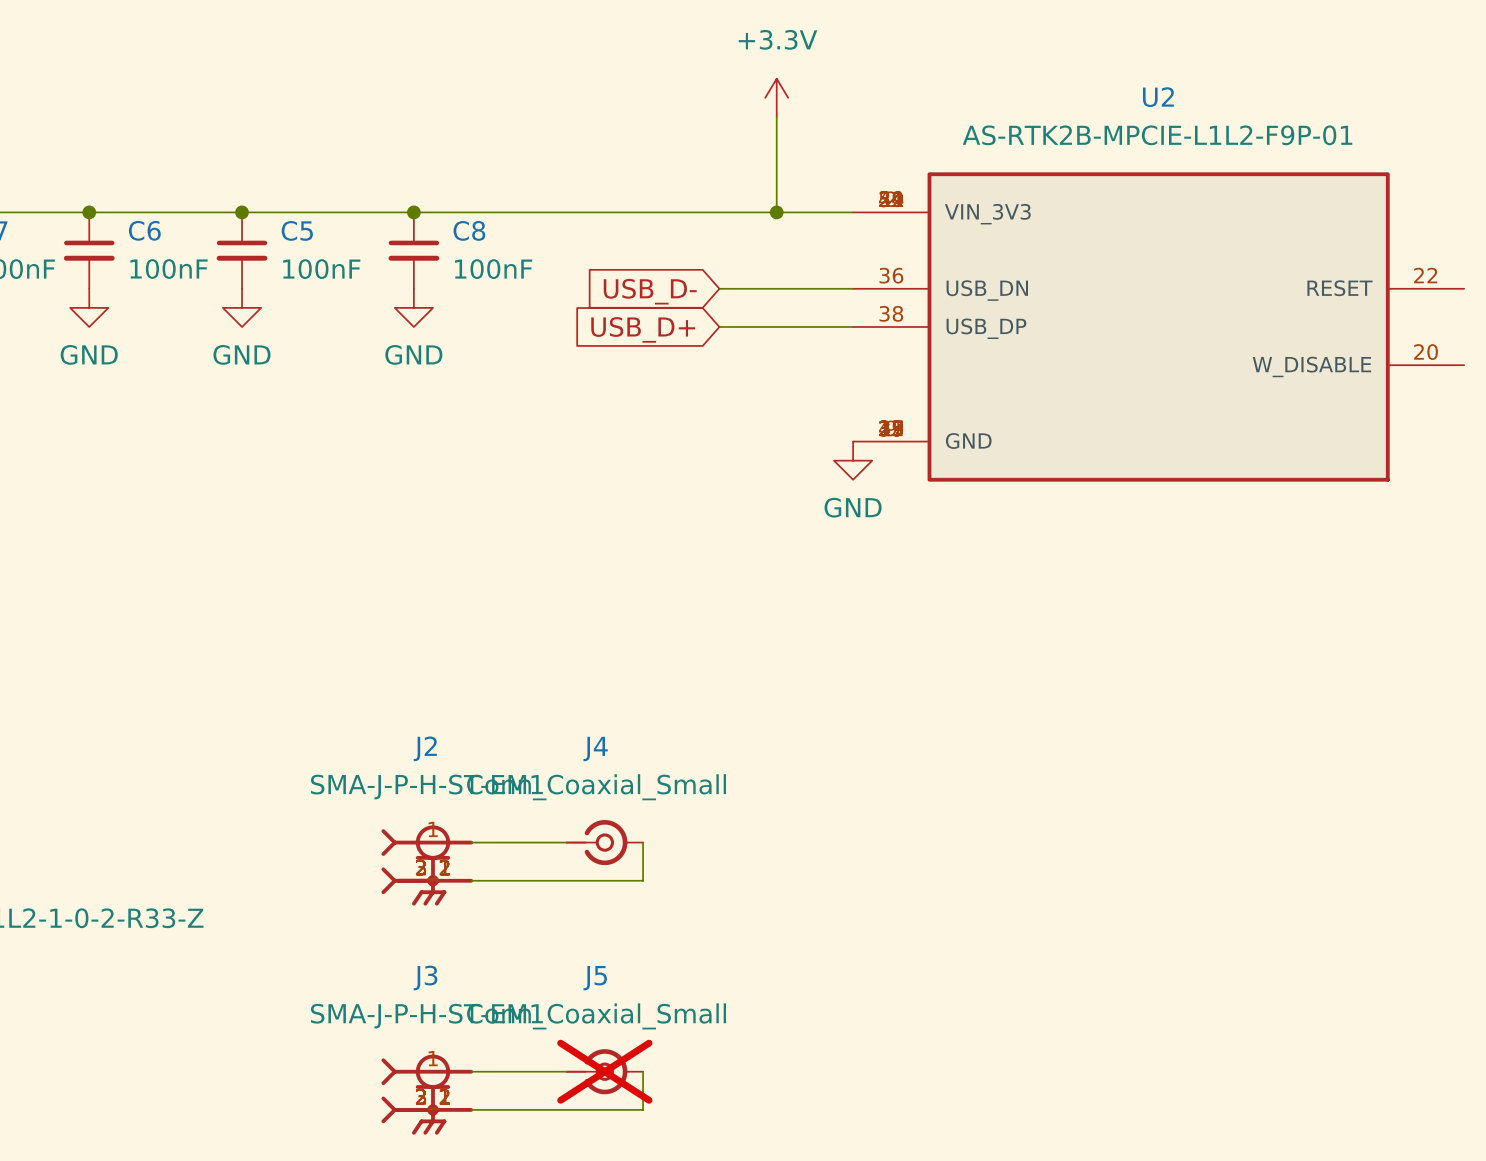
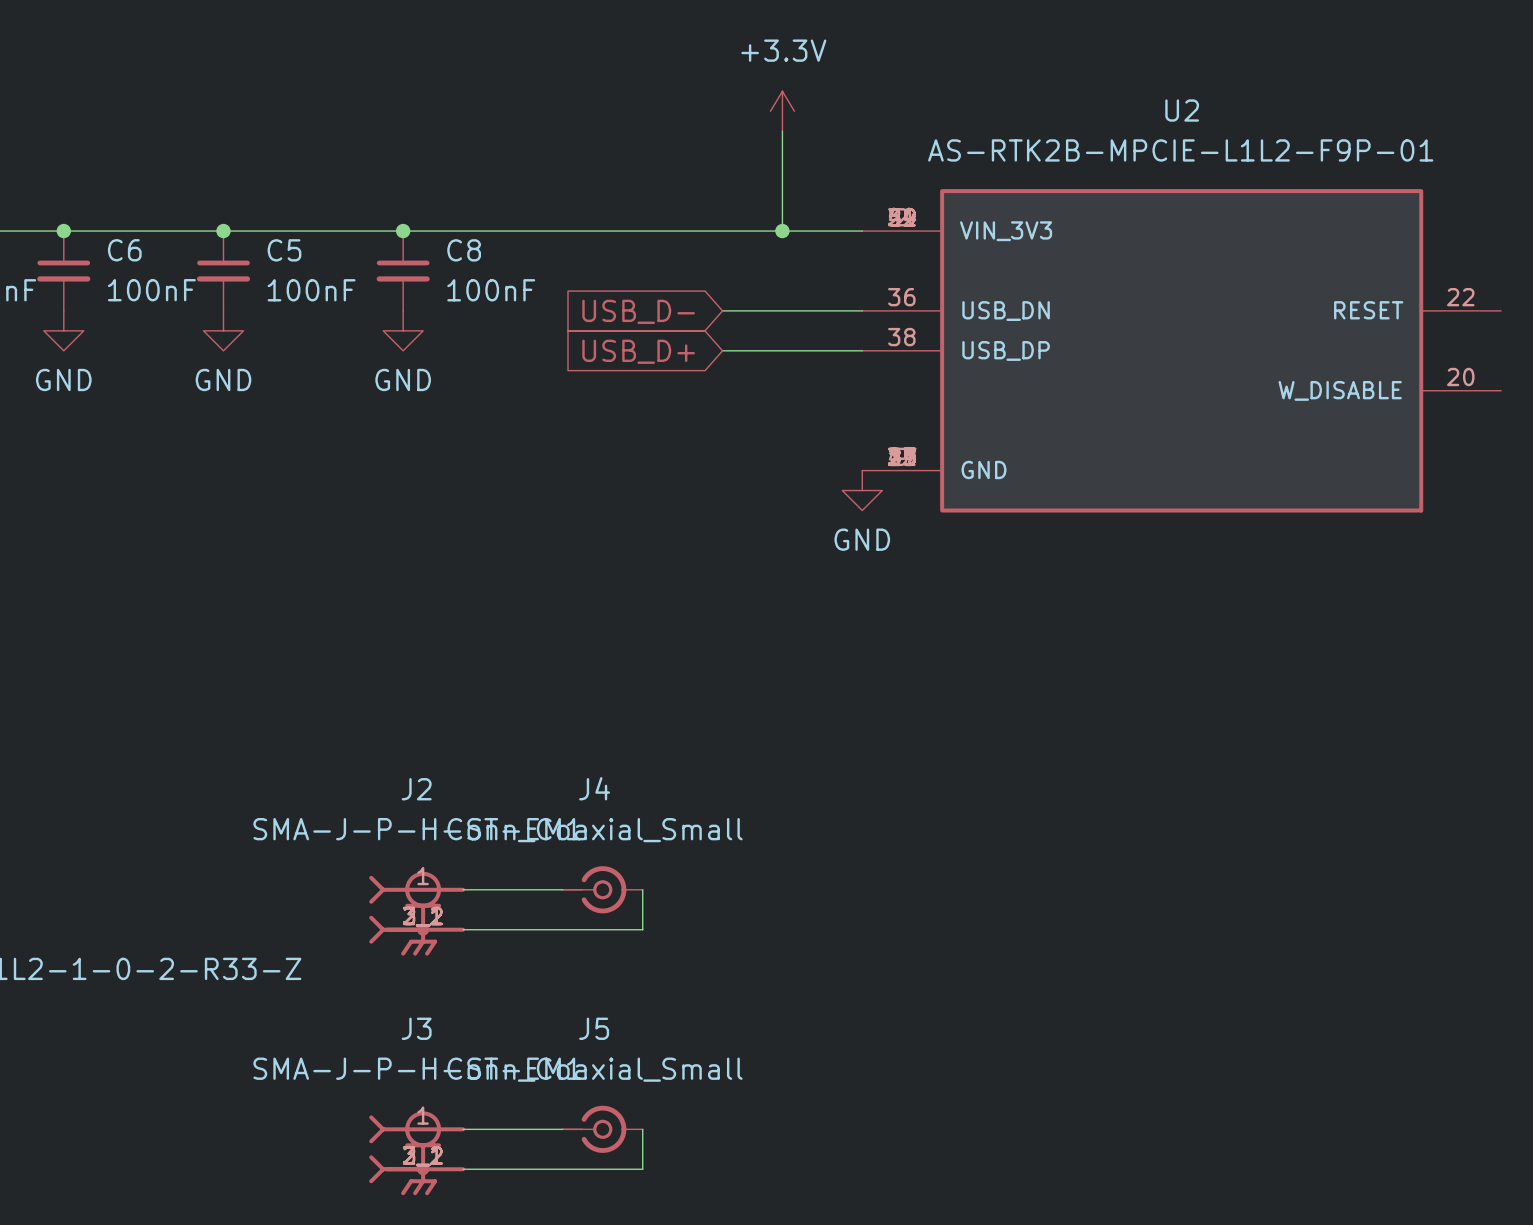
J5 do-not-place cross: (604, 1071) -> none

